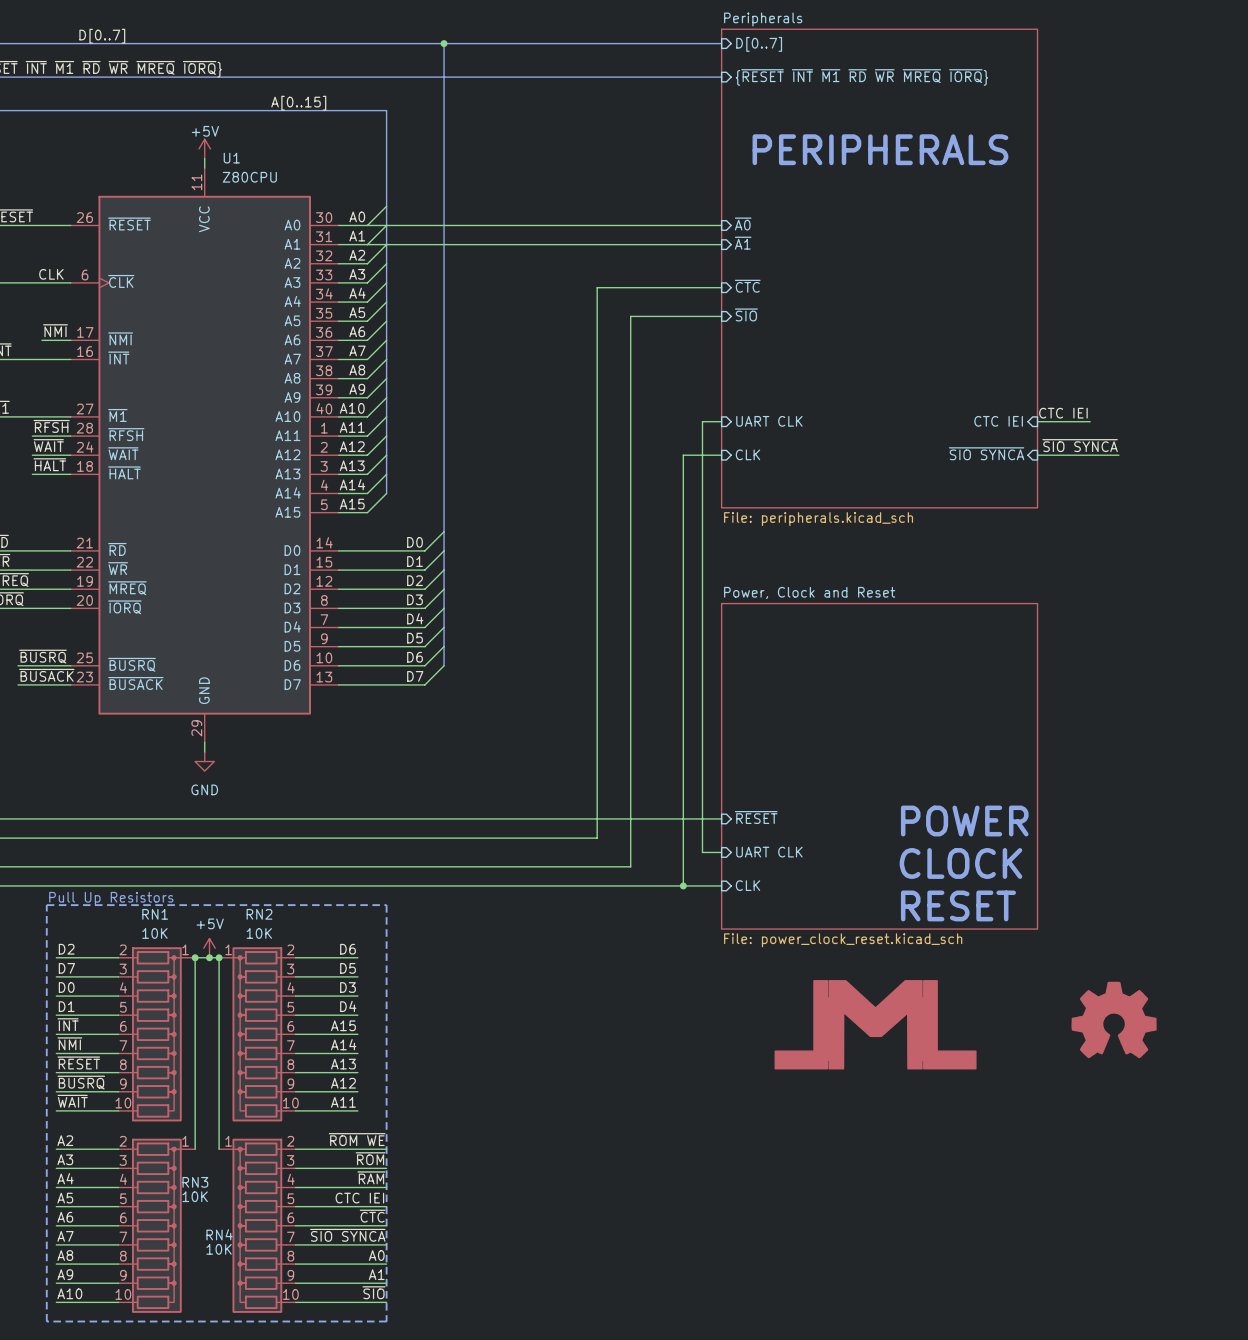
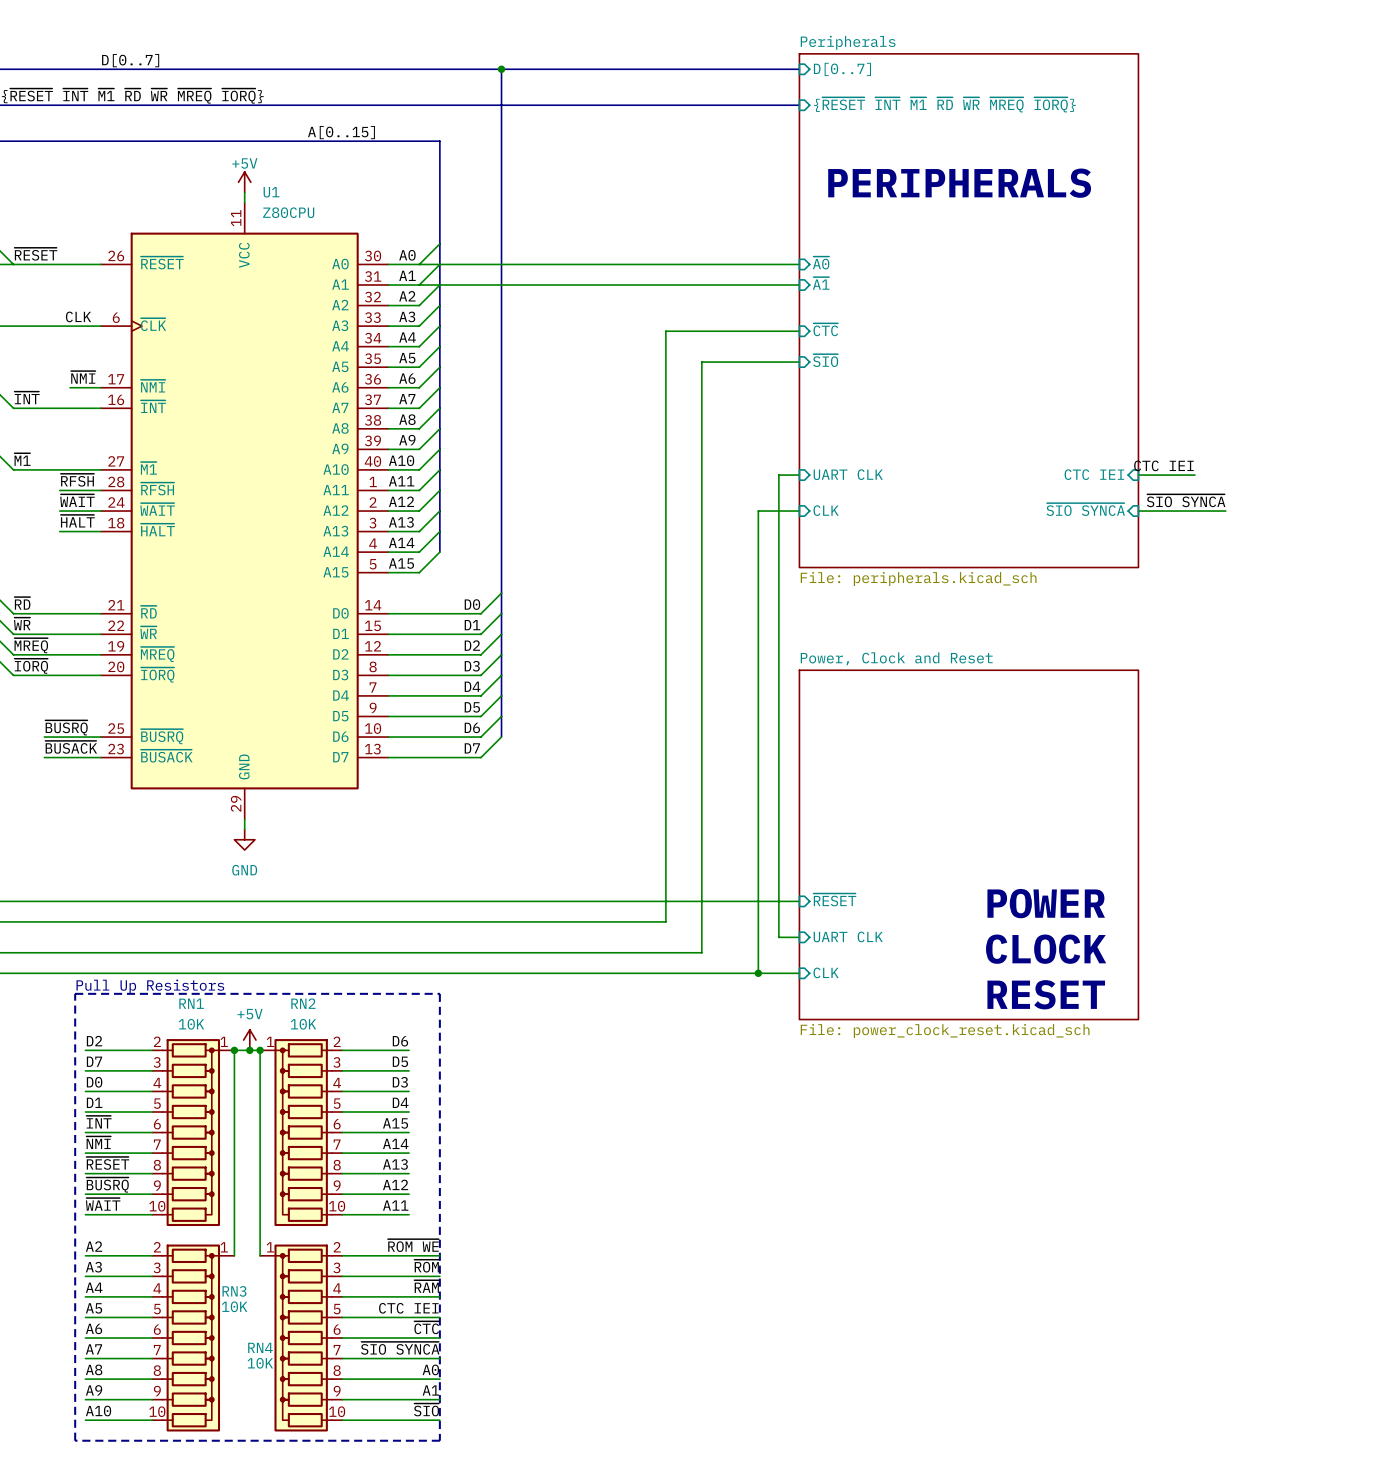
power symbol: (1114, 1019) -> none
power symbol: (875, 1024) -> none

